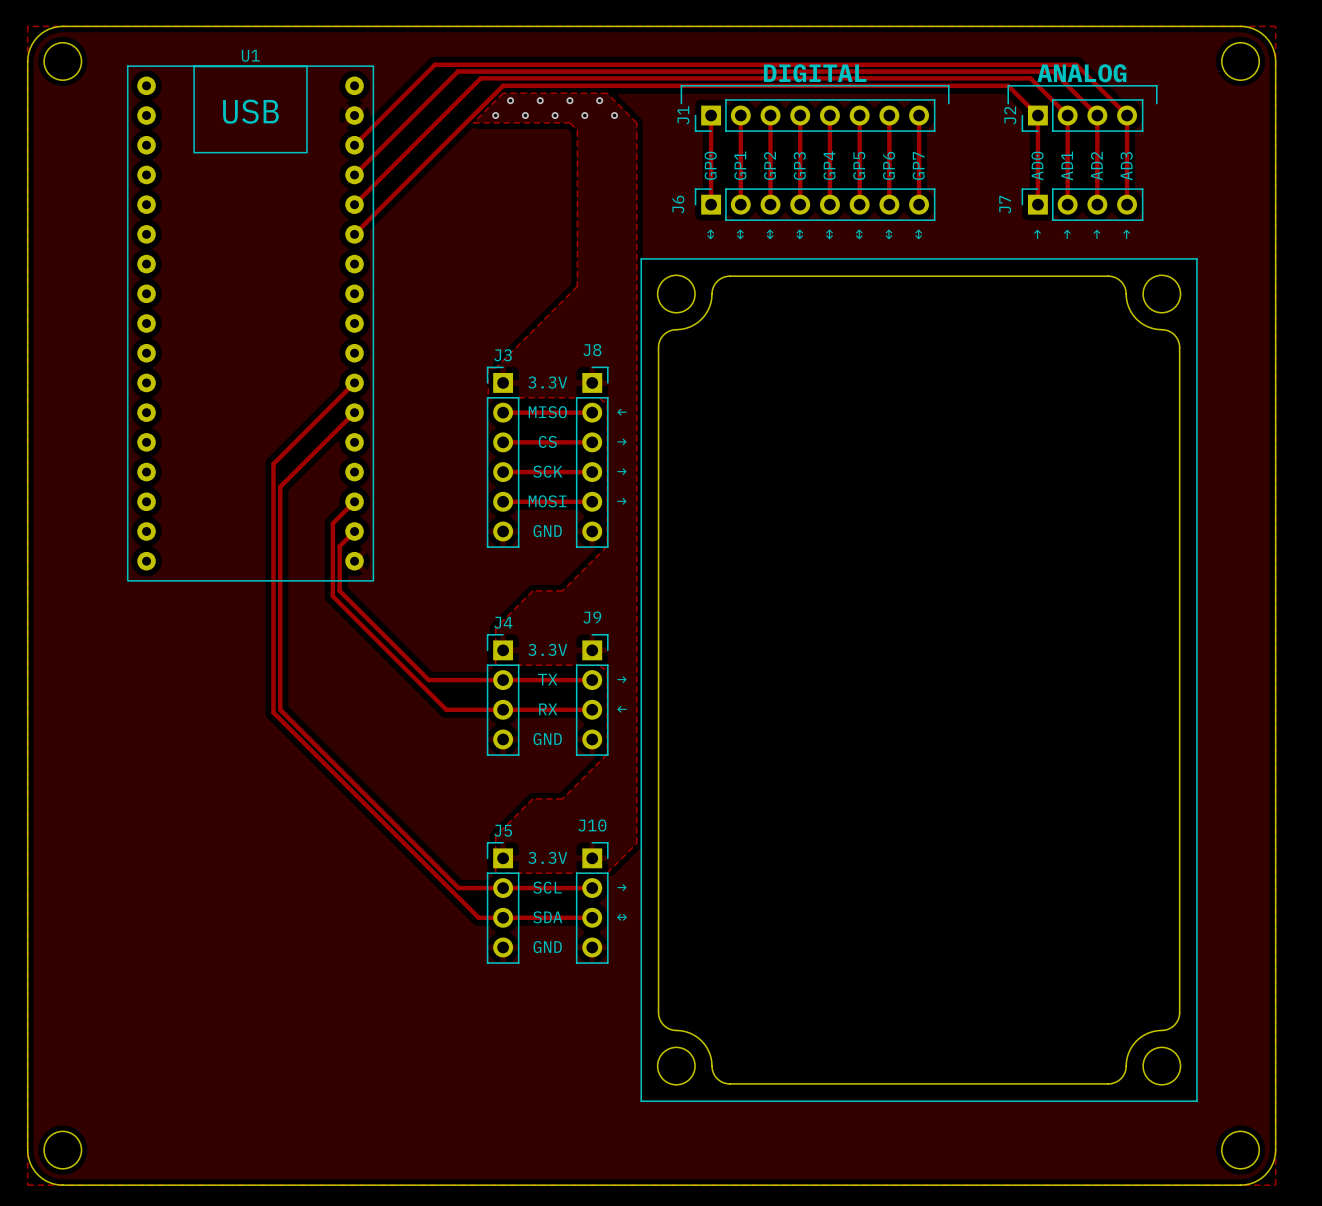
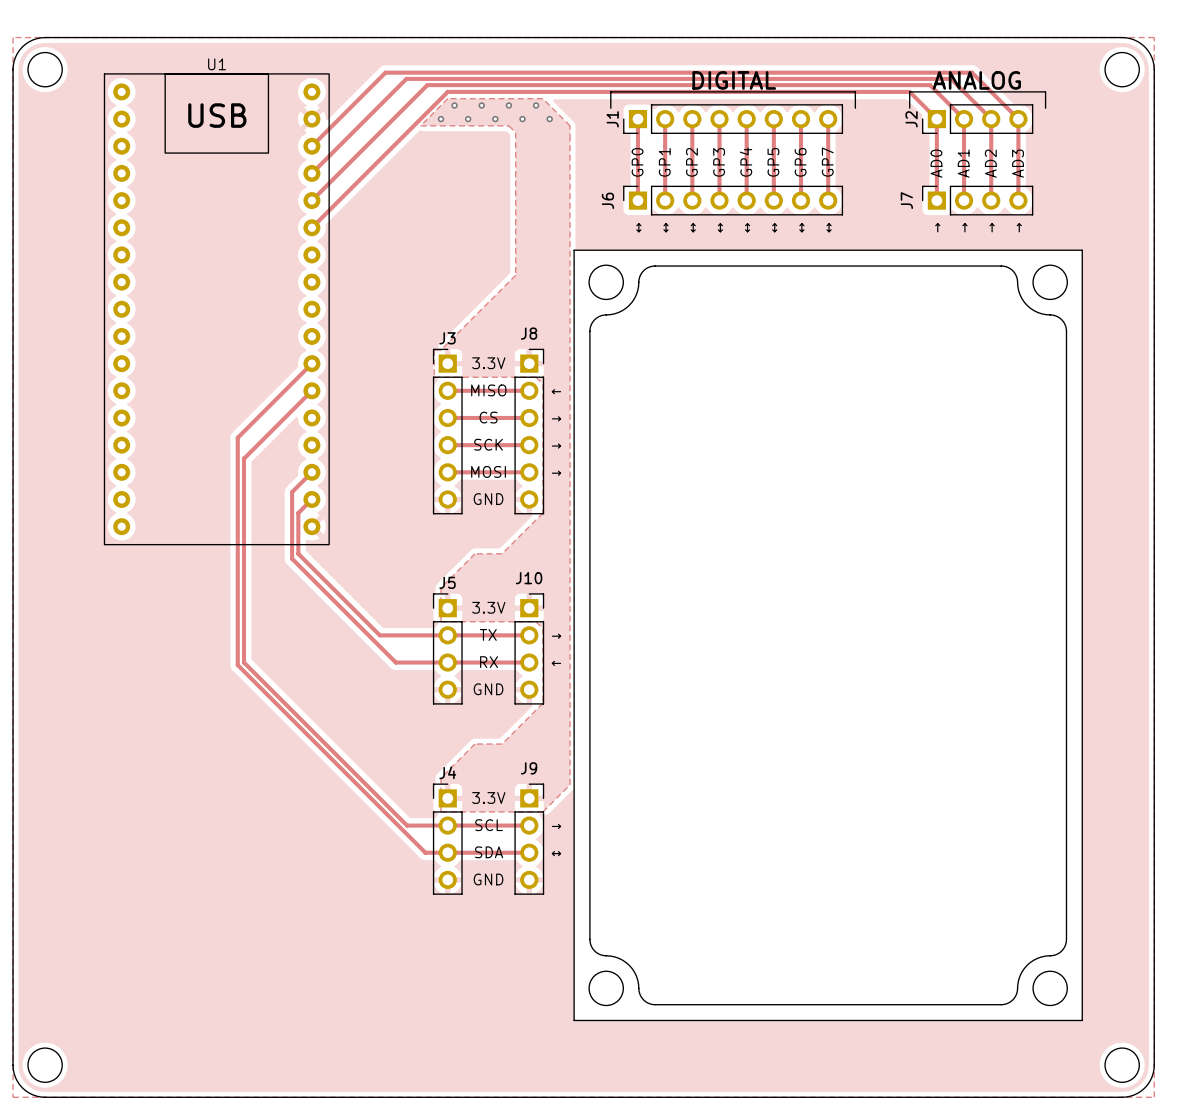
J9 name: J9 (592, 617) -> J10 (529, 578)
J4 name: J4 (503, 622) -> J5 (447, 582)
J10 name: J10 (592, 825) -> J9 (529, 768)
J5 name: J5 (503, 830) -> J4 (447, 772)

